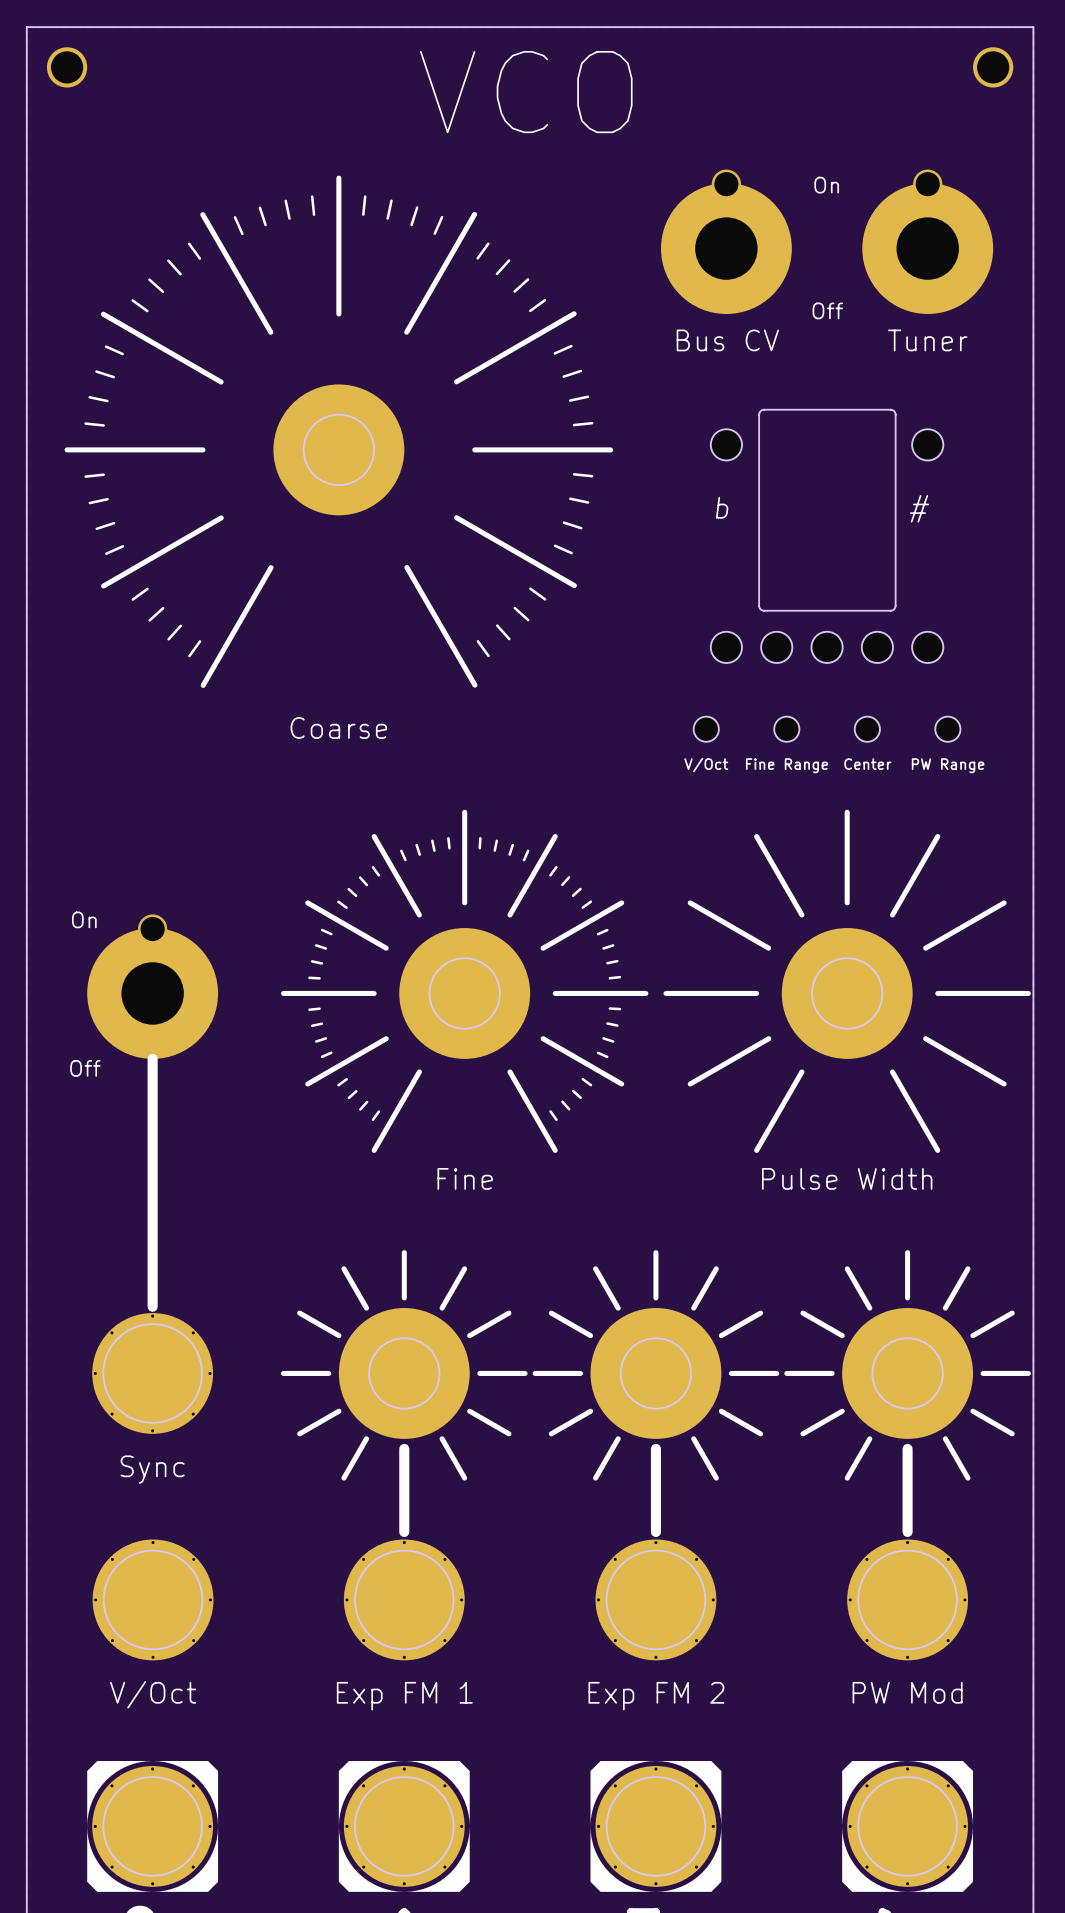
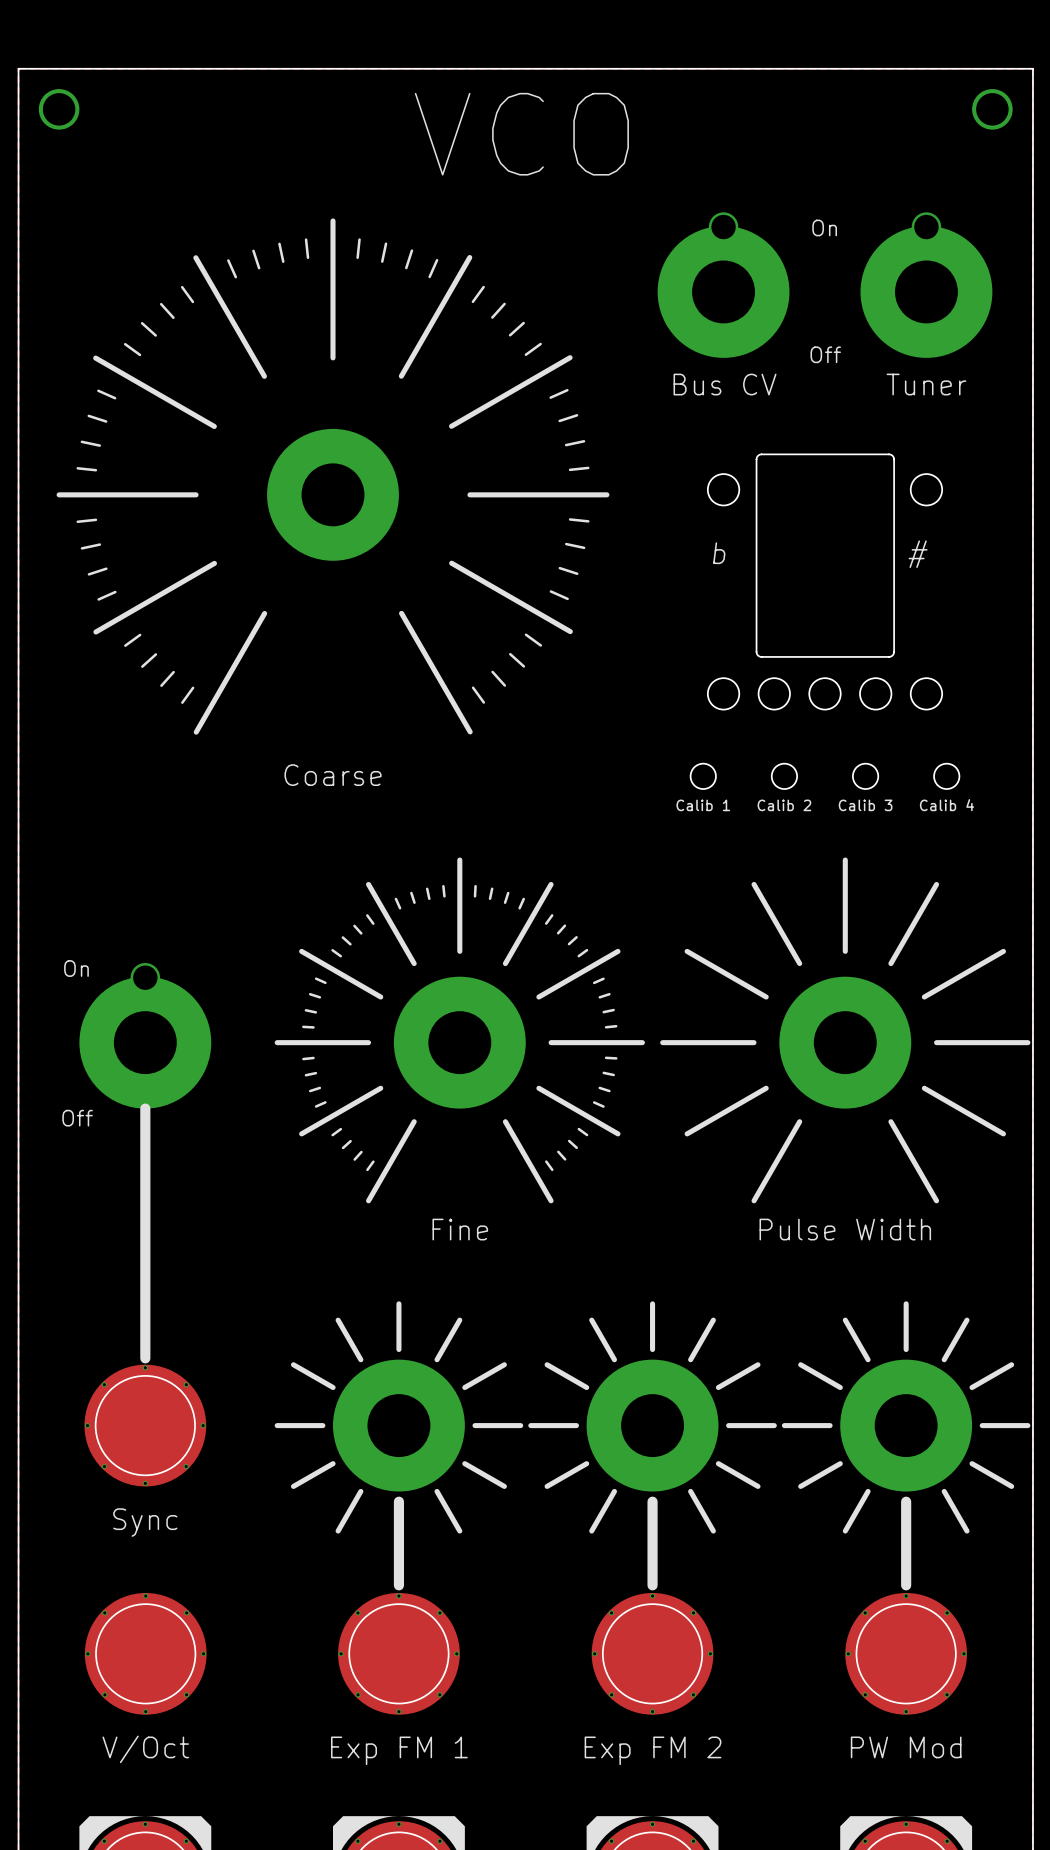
part footprint: [64, 175, 614, 688] -> [56, 218, 610, 735]
part value: Center (867, 764) -> Calib 3 (865, 805)
part value: V/Oct (706, 765) -> Calib 1 (703, 805)
part value: Fine Range (787, 765) -> Calib 2 (784, 805)
part value: PW Range (948, 765) -> Calib 4 (946, 805)
part footprint: [280, 809, 649, 1153] -> [274, 857, 645, 1204]
part footprint: [663, 809, 1031, 1153] -> [660, 857, 1031, 1204]
part footprint: [280, 1250, 528, 1481] -> [274, 1301, 524, 1534]
part footprint: [532, 1250, 780, 1481] -> [528, 1301, 777, 1534]
part footprint: [784, 1250, 1031, 1481] -> [781, 1301, 1031, 1534]

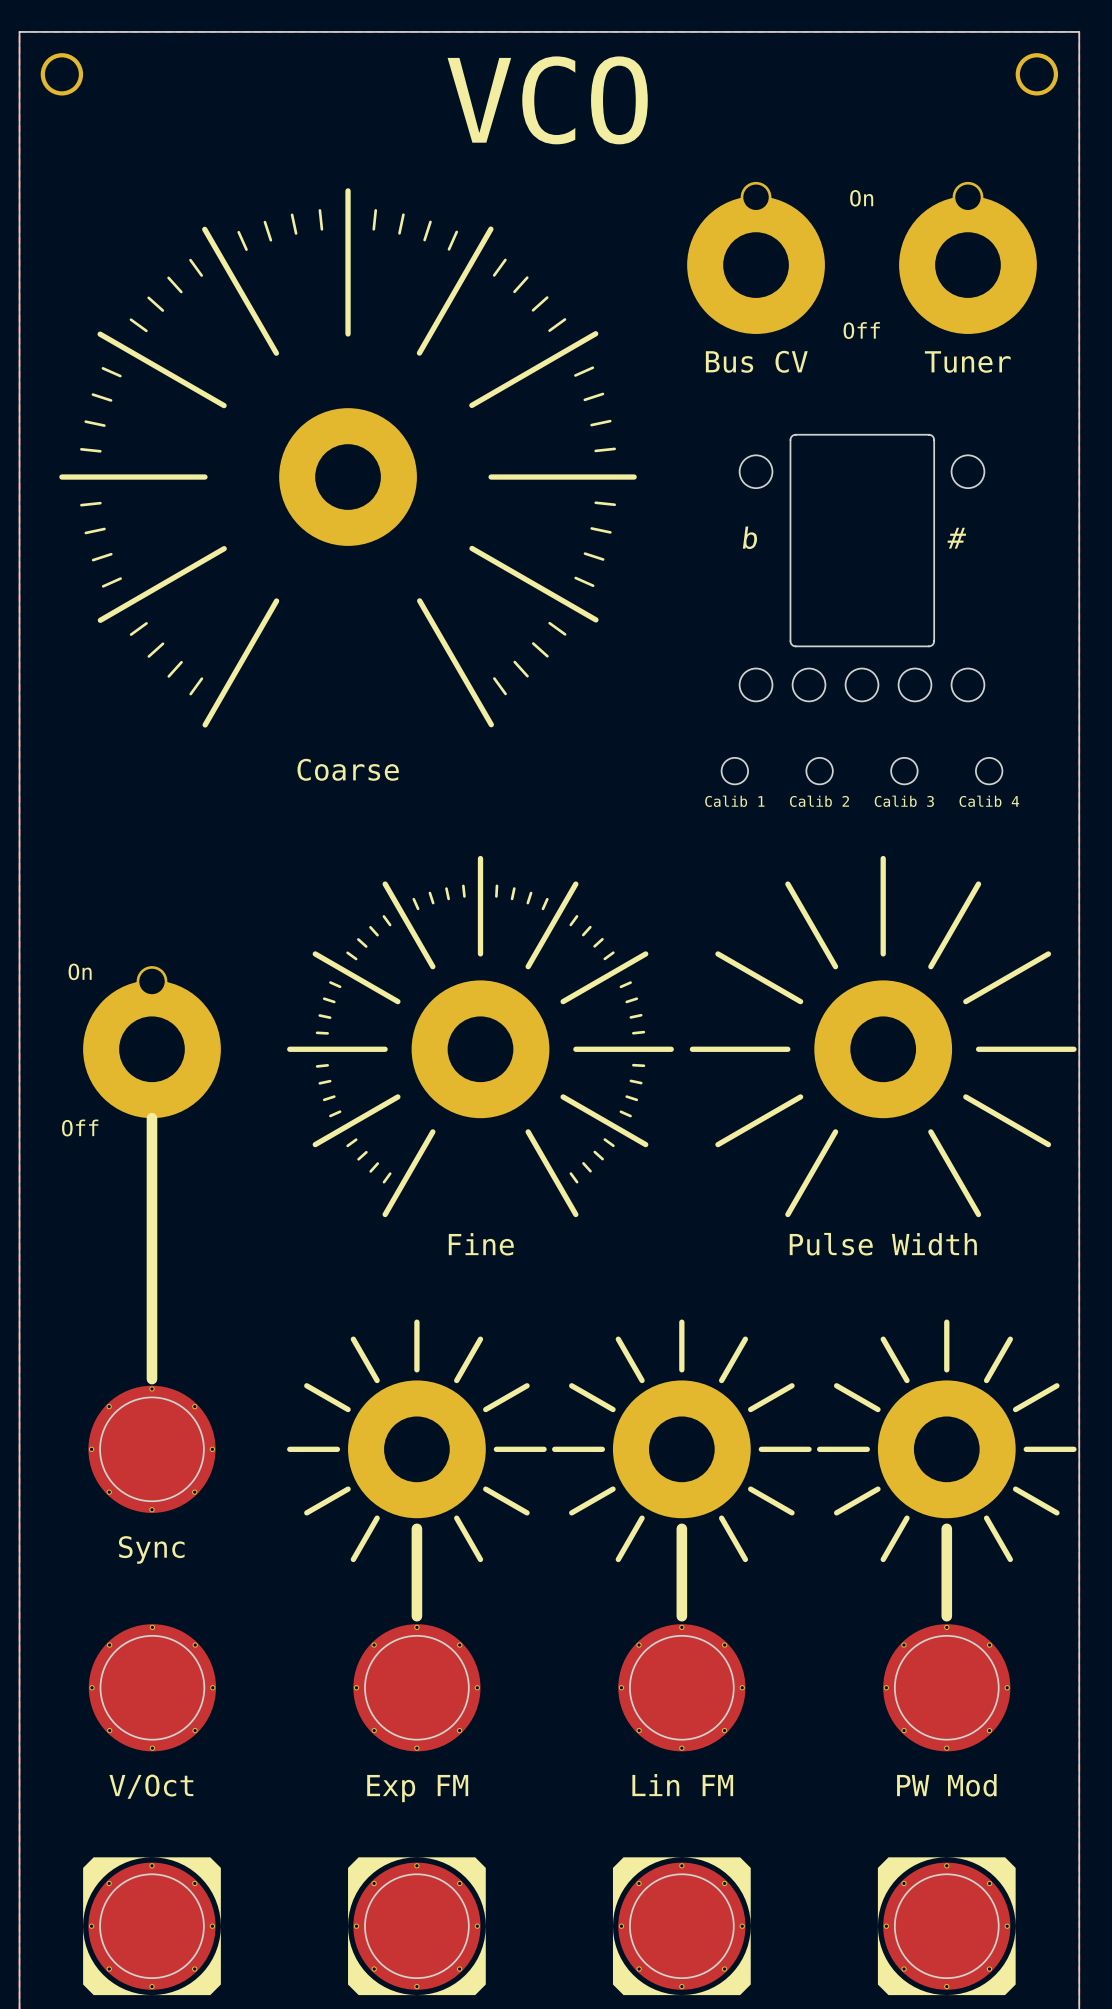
part value: Exp FM 1 (399, 1750) -> Exp FM (417, 1788)
part value: Exp FM 2 (653, 1750) -> Lin FM (682, 1785)

